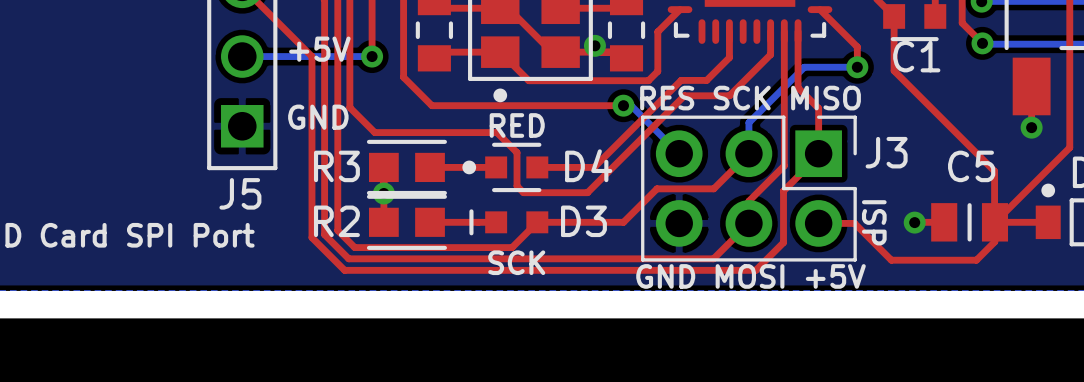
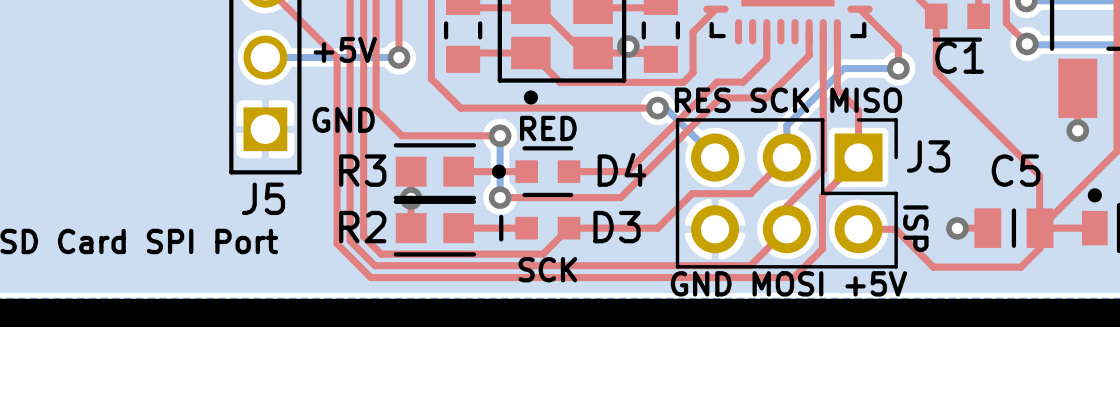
top track: (470, 132) (496, 132) (517, 152) (517, 186) (523, 192) -> (500, 197) (554, 197)
bottom track: none -> (500, 135) (500, 197)
via: none -> (500, 135)
via: none -> (500, 197)

